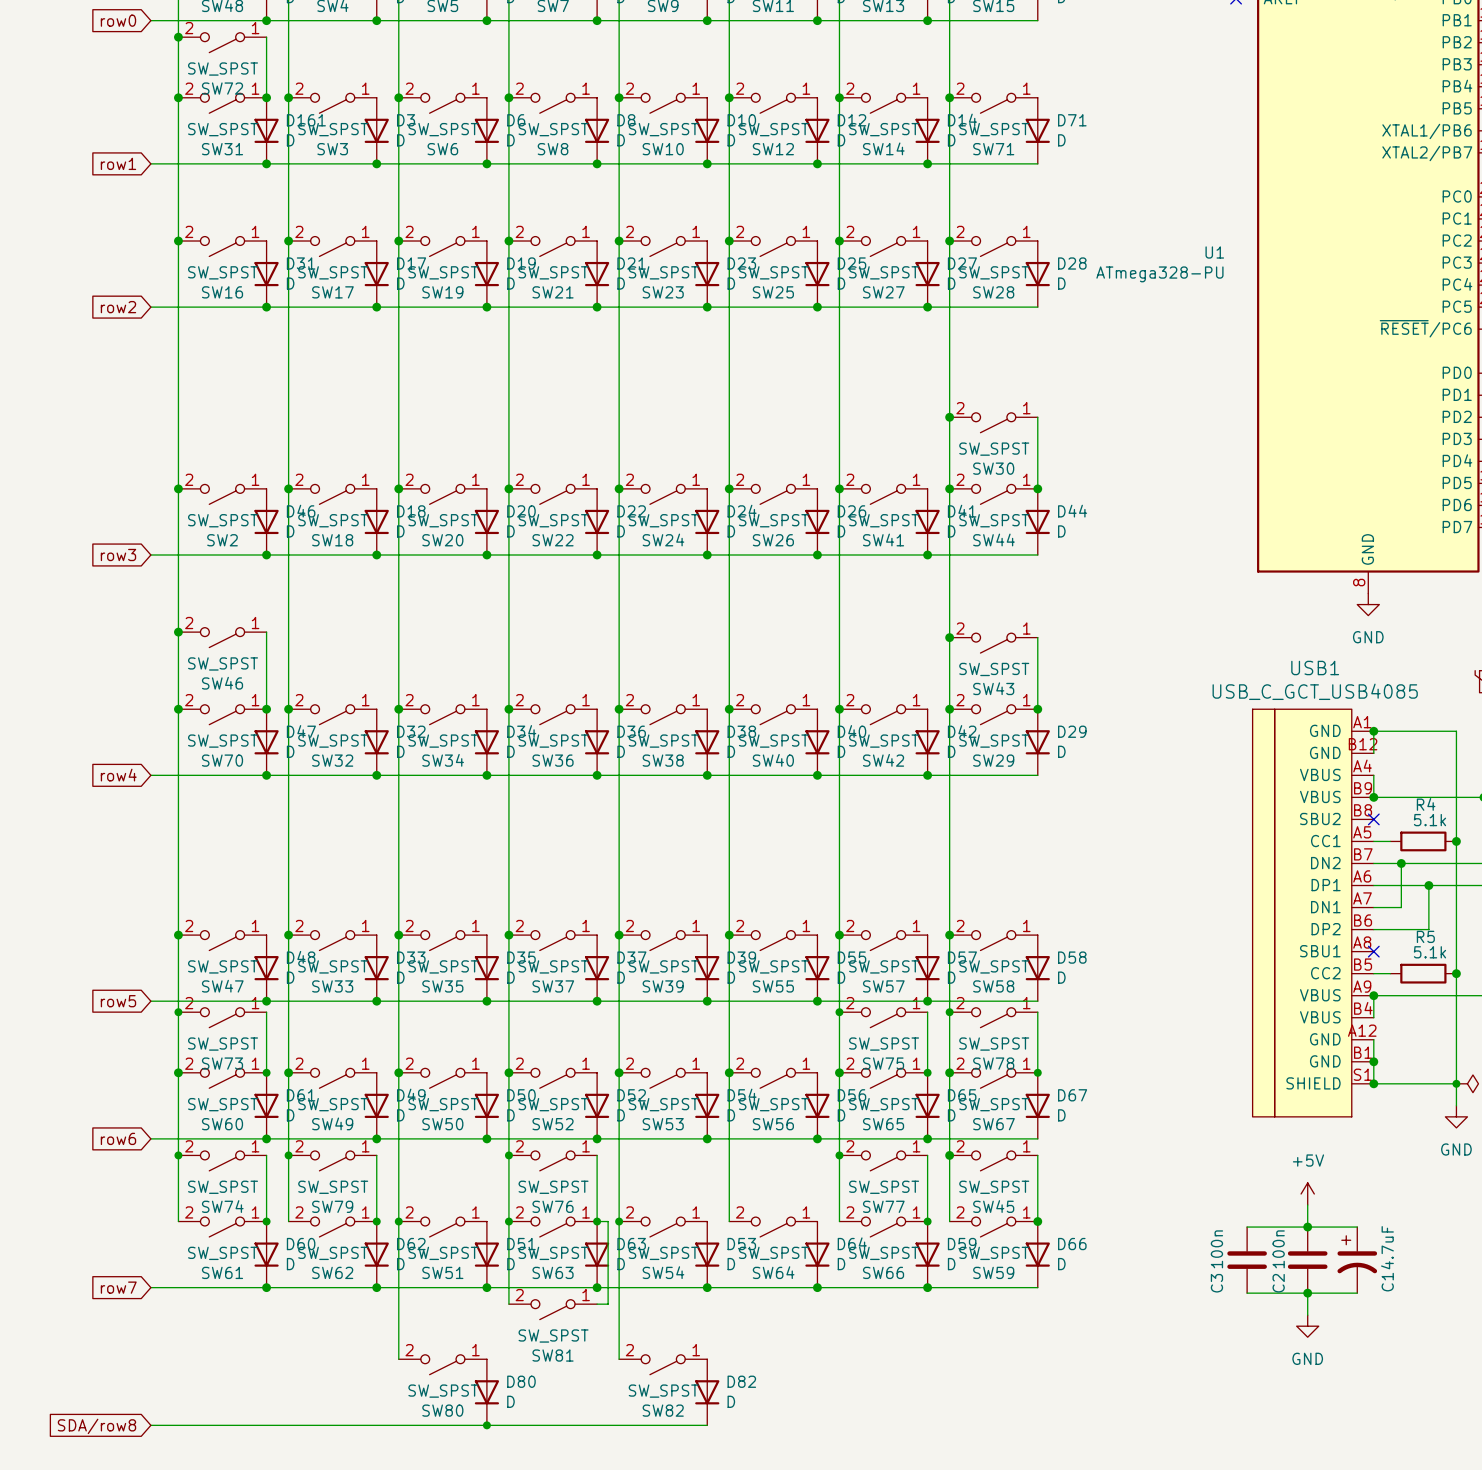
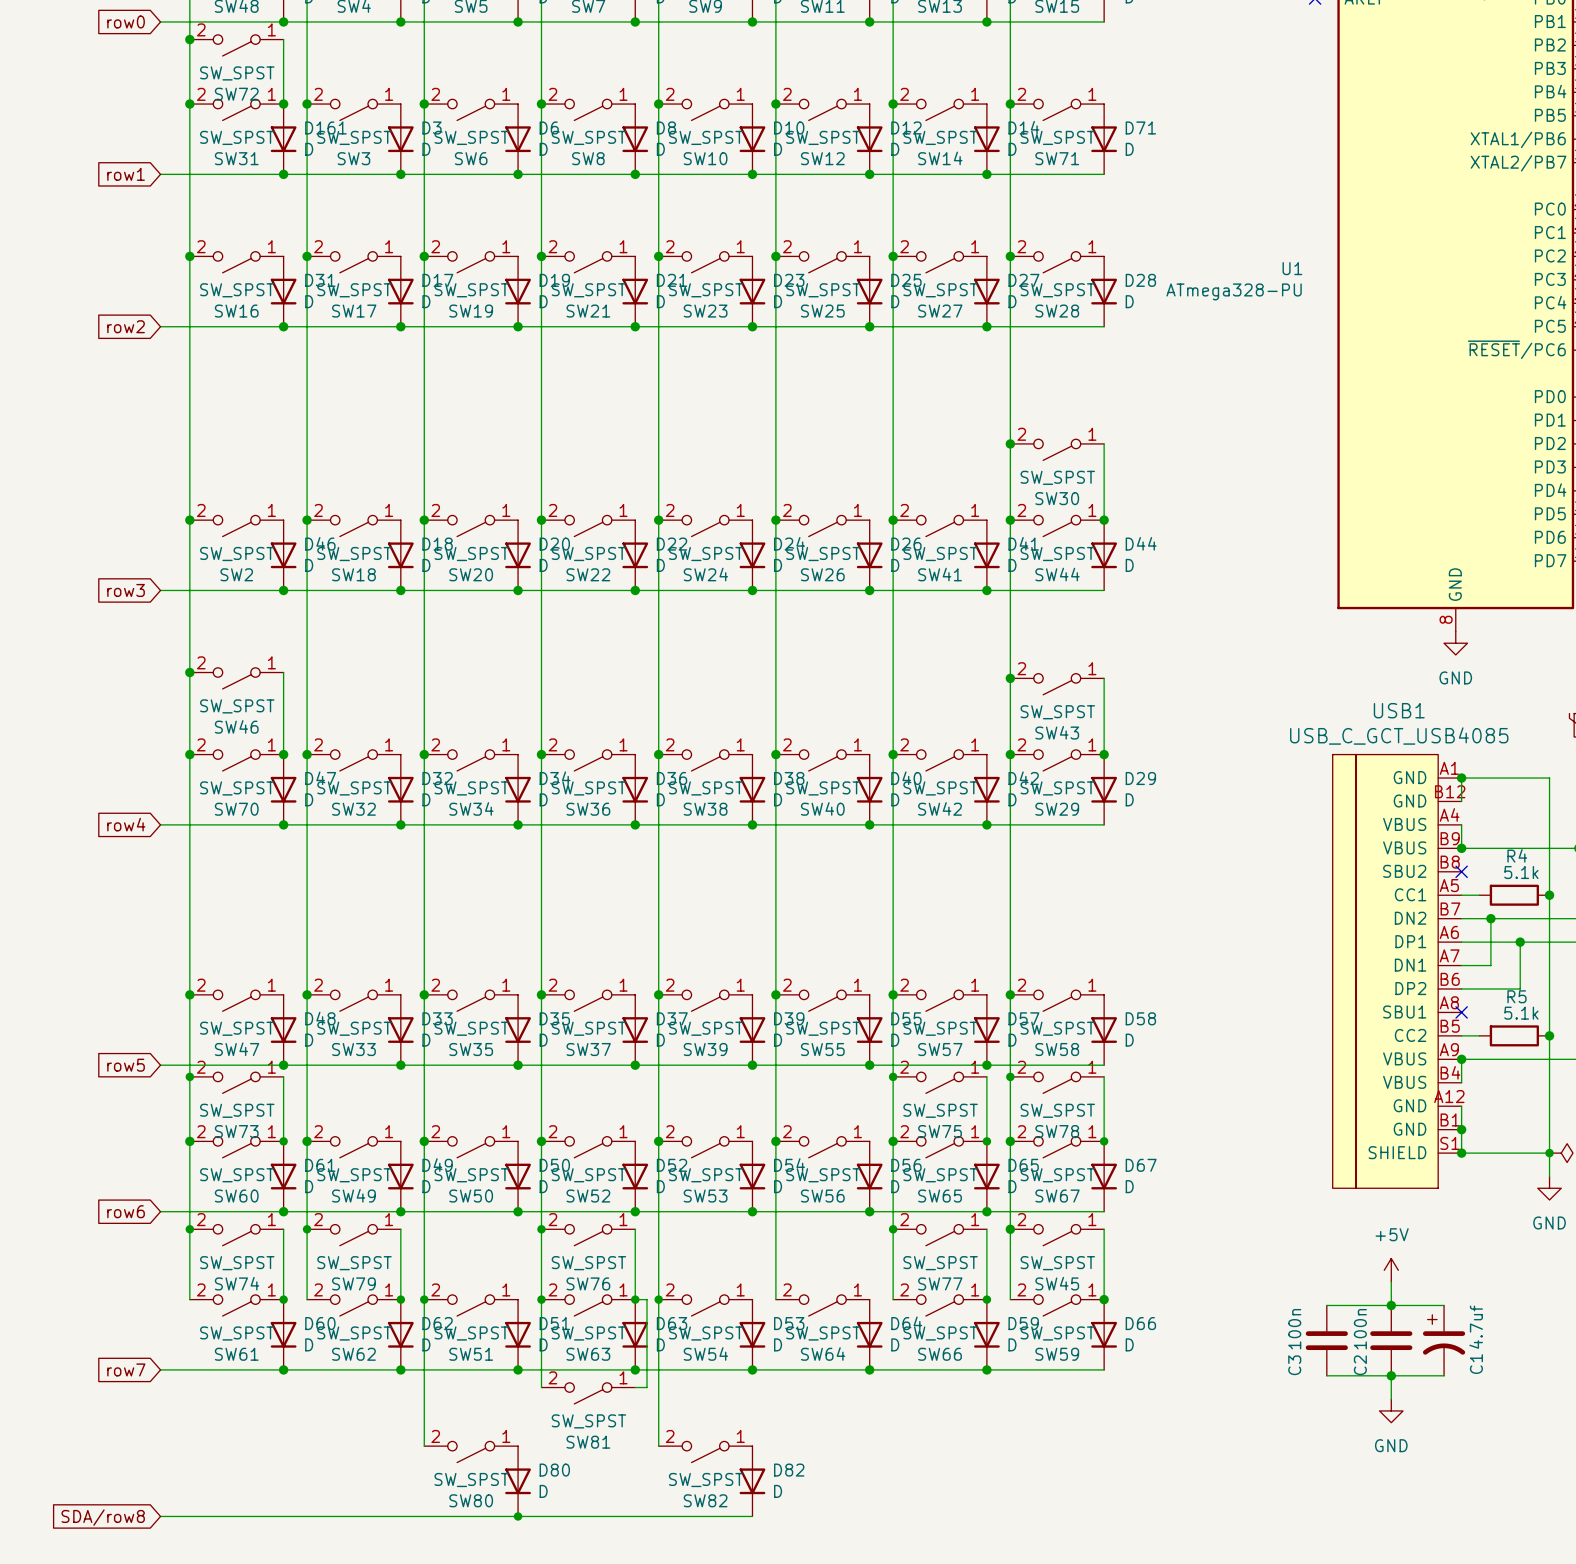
C1 value: 4.7uF (1387, 1247) -> 4.7uf (1476, 1327)

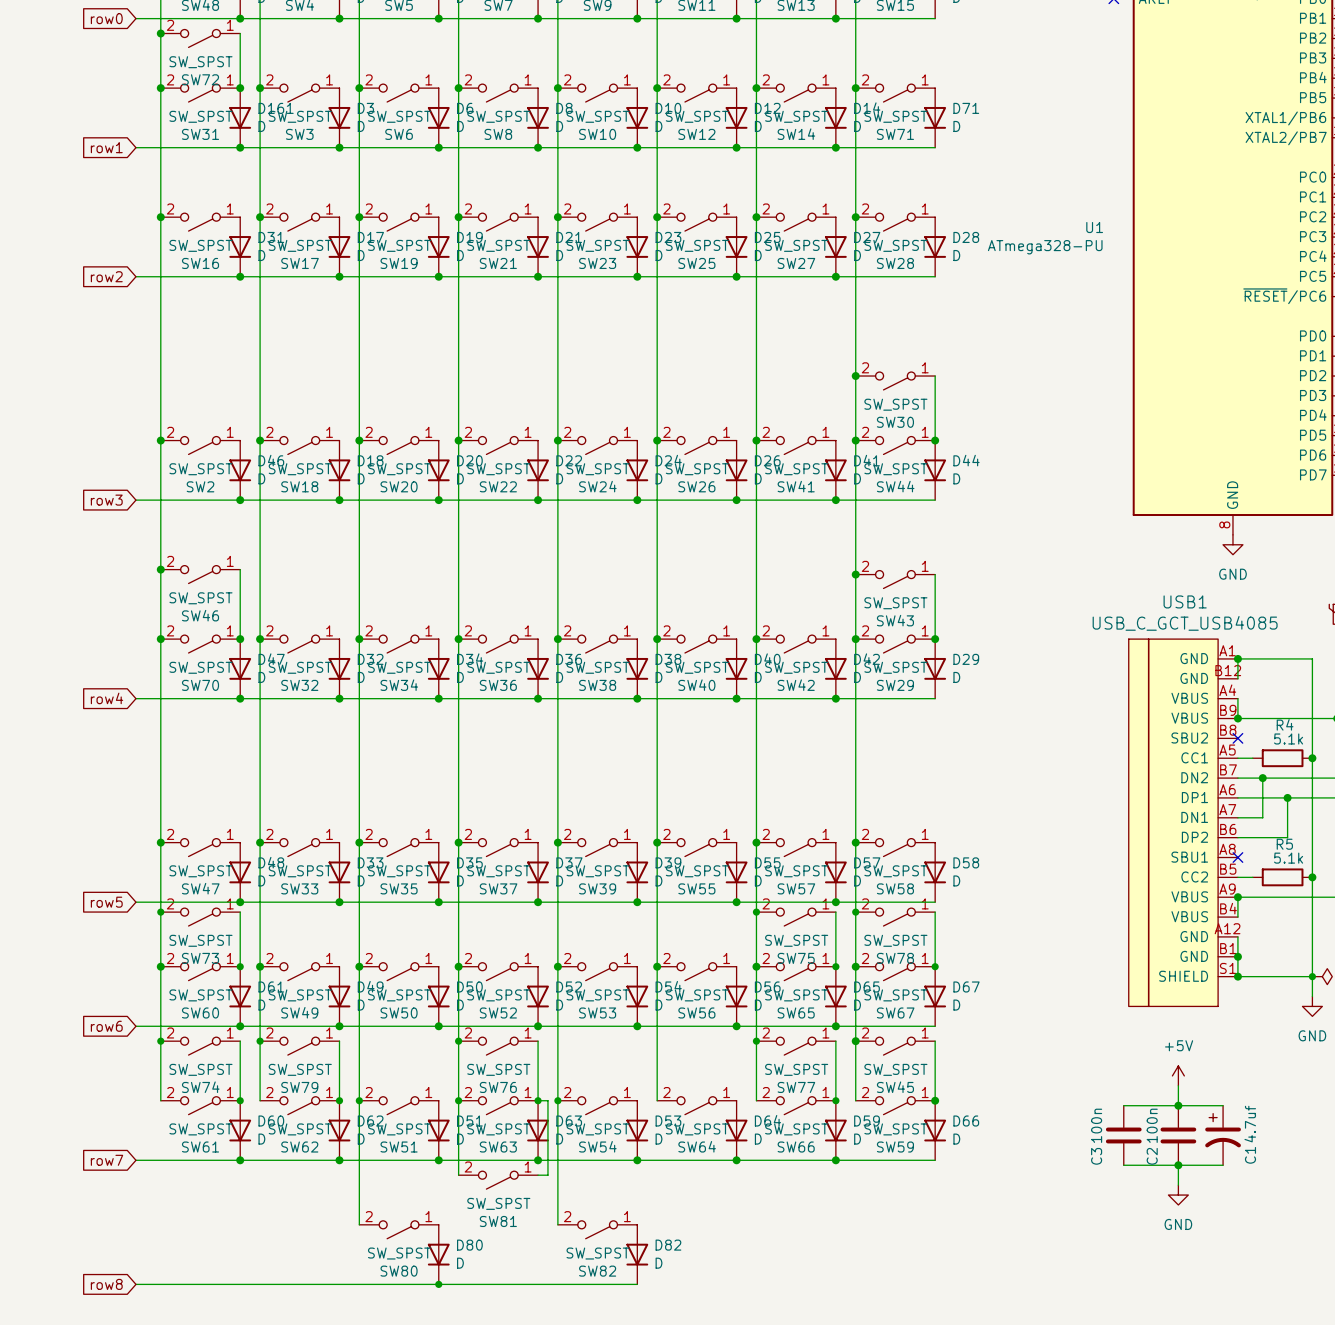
global label: SDA/row8 (103, 1517) -> row8 (106, 1284)

